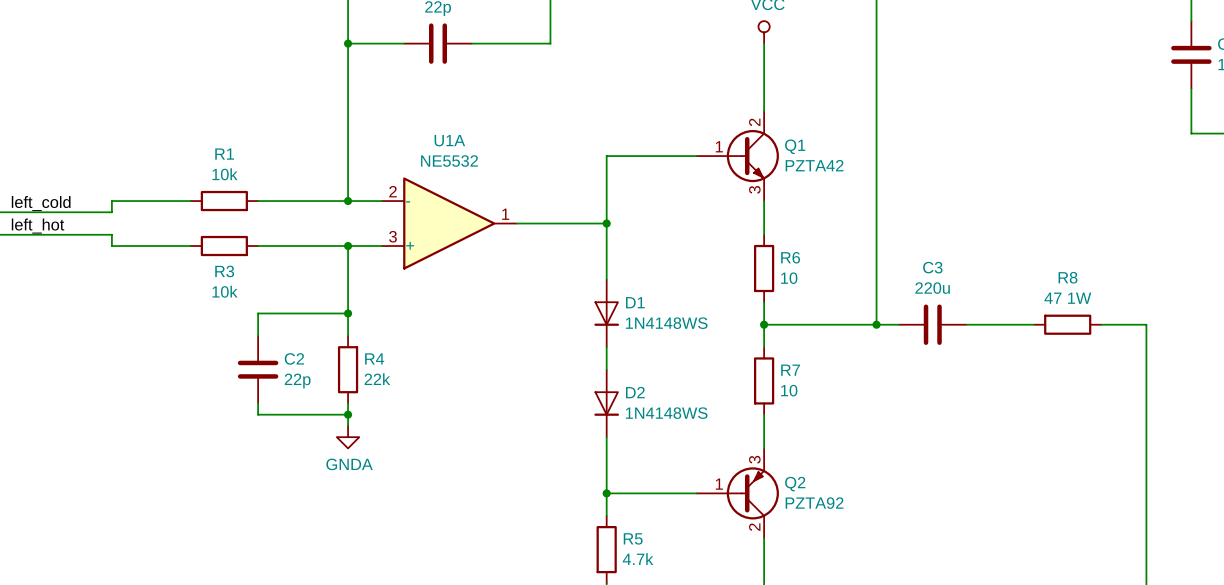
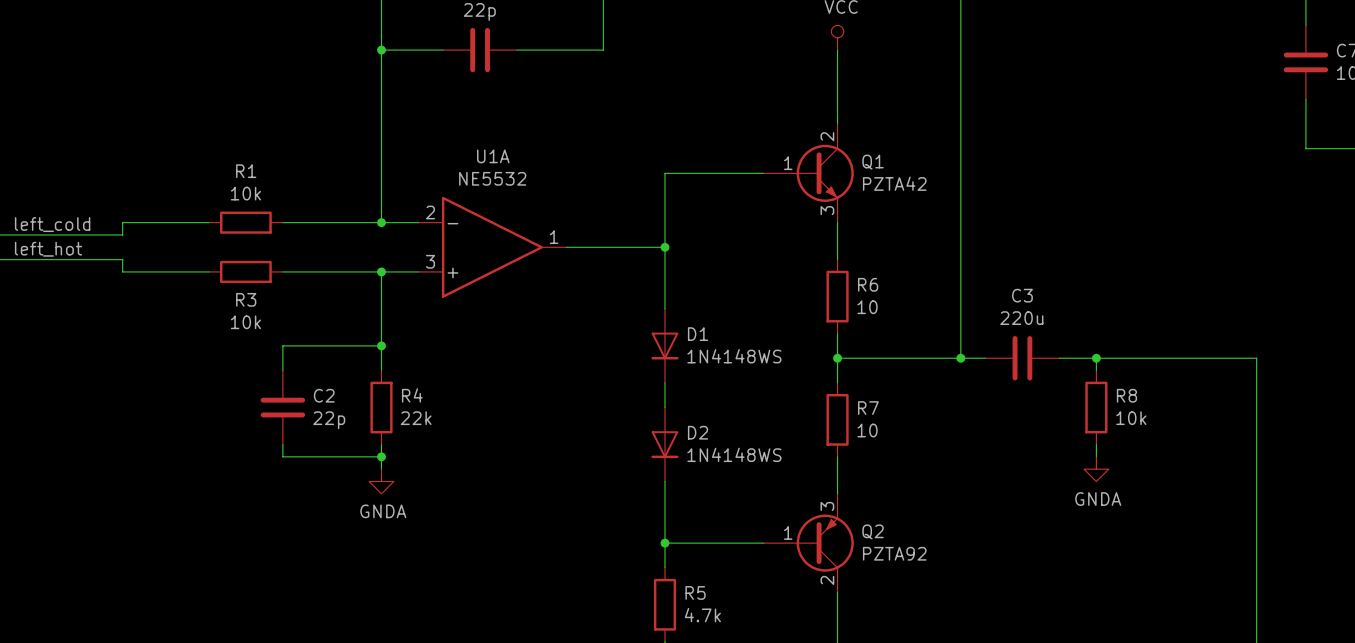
R8 name position: R8 (1068, 277) -> R8 (1126, 395)
R8 value: 47 1W (1067, 298) -> 10k (1131, 418)
wire: none -> (1096, 358) (1096, 370)
junction: none -> (1096, 358)
wire: none -> (1133, 358) (1207, 358)
R8 rotation: 0° (1067, 324) -> 90° clockwise (1096, 407)
R8 position: (1067, 324) -> (1096, 407)
wire: none -> (1096, 444) (1096, 456)
power symbol: none -> GNDA (1096, 469)

